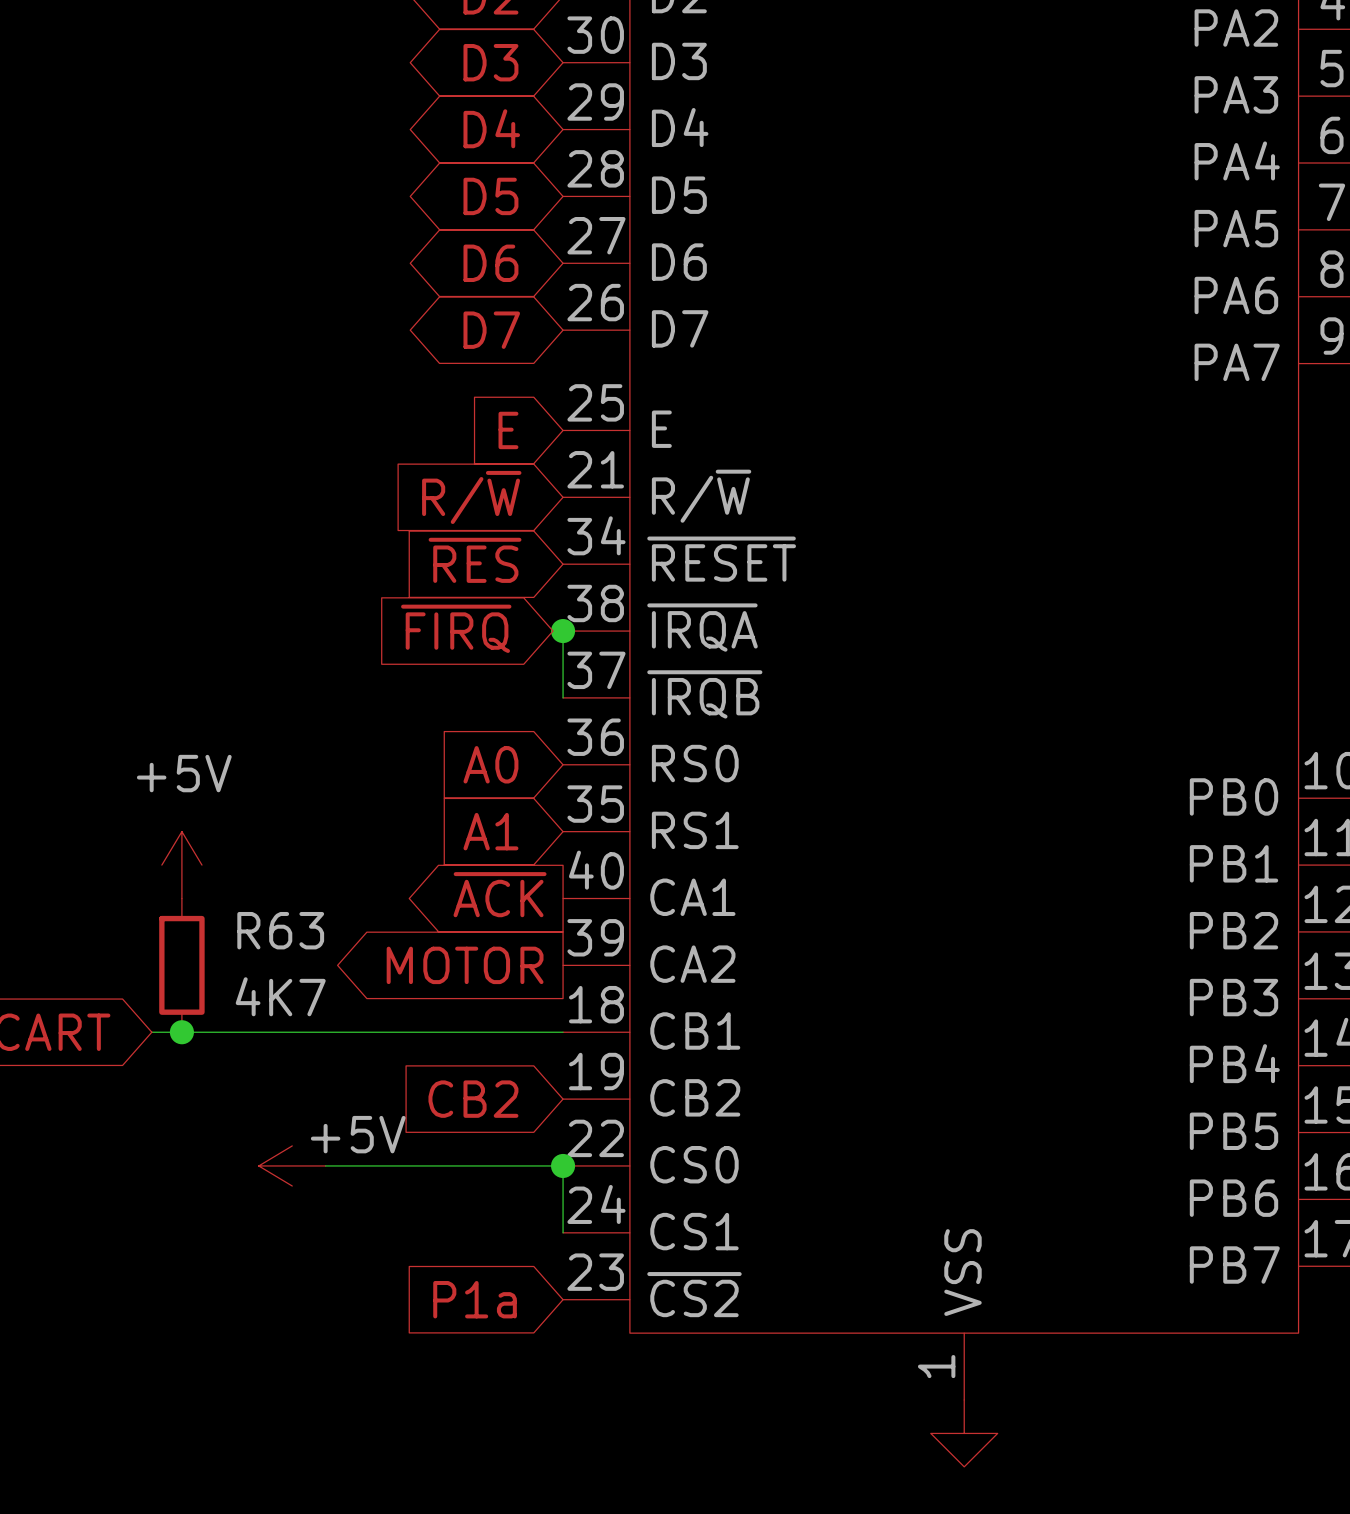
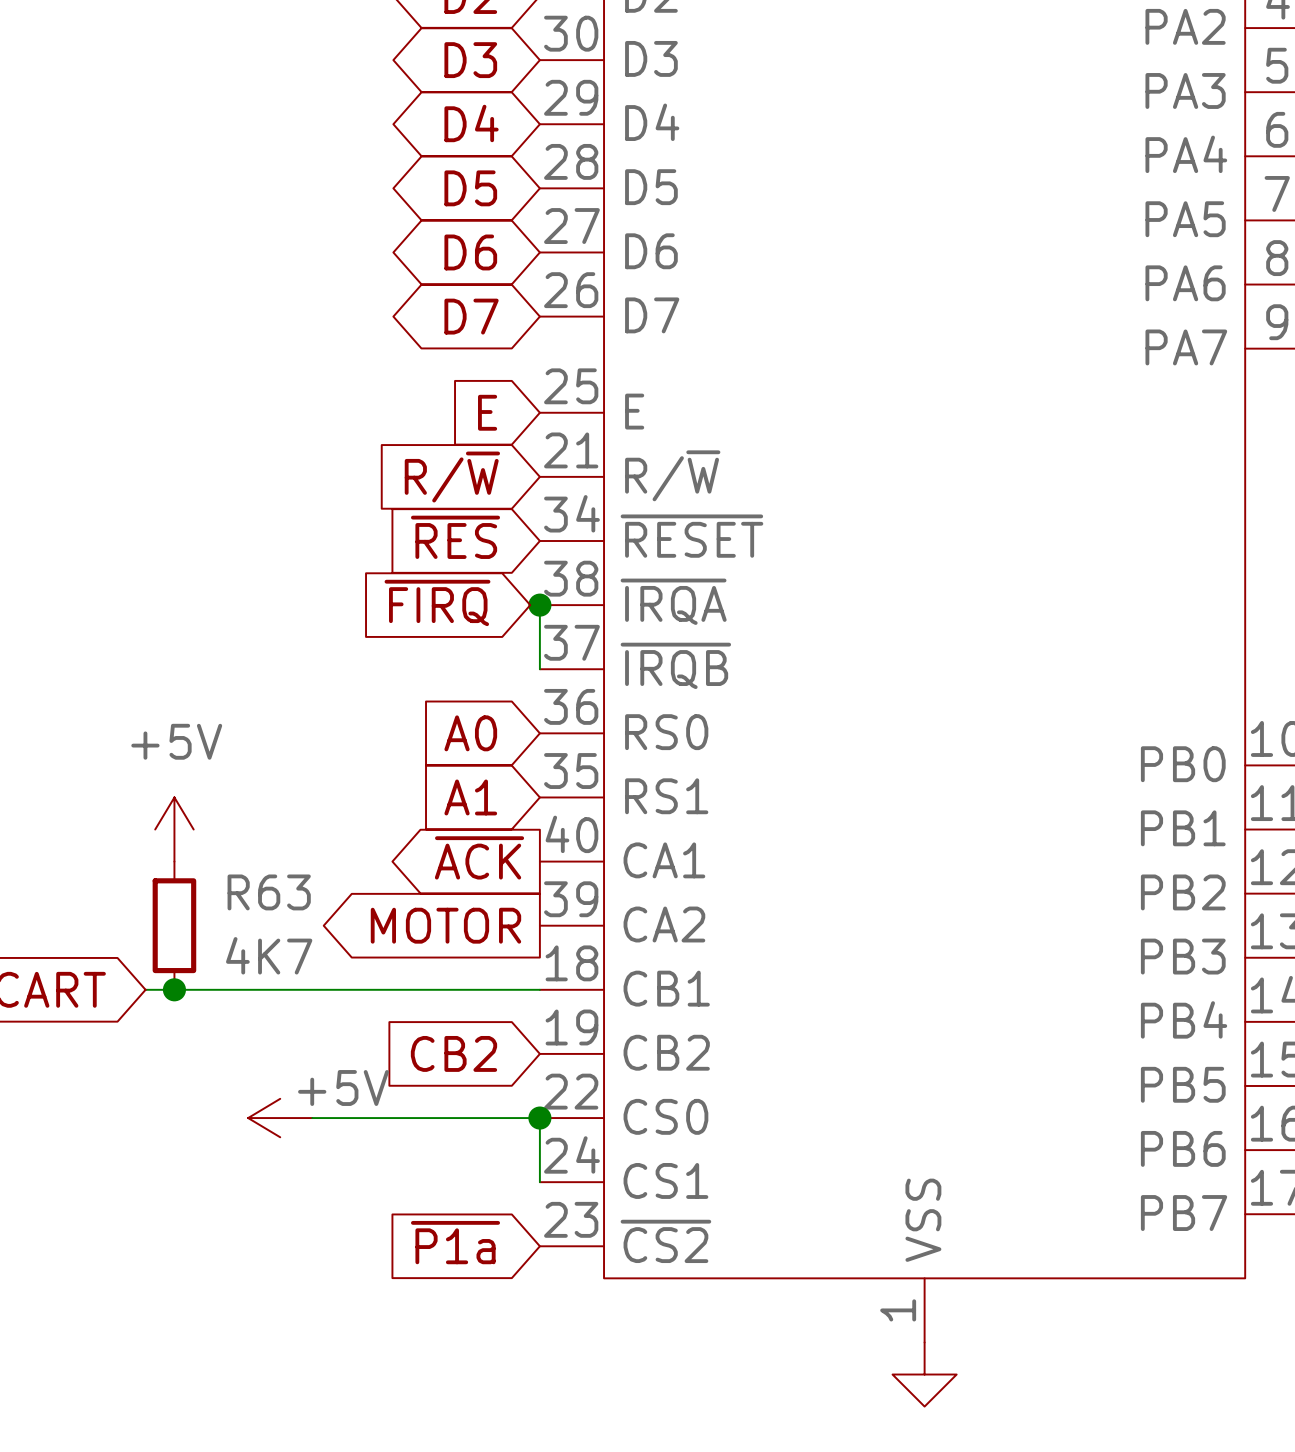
global label: P1a (475, 1299) -> ~{P1a} (455, 1242)

